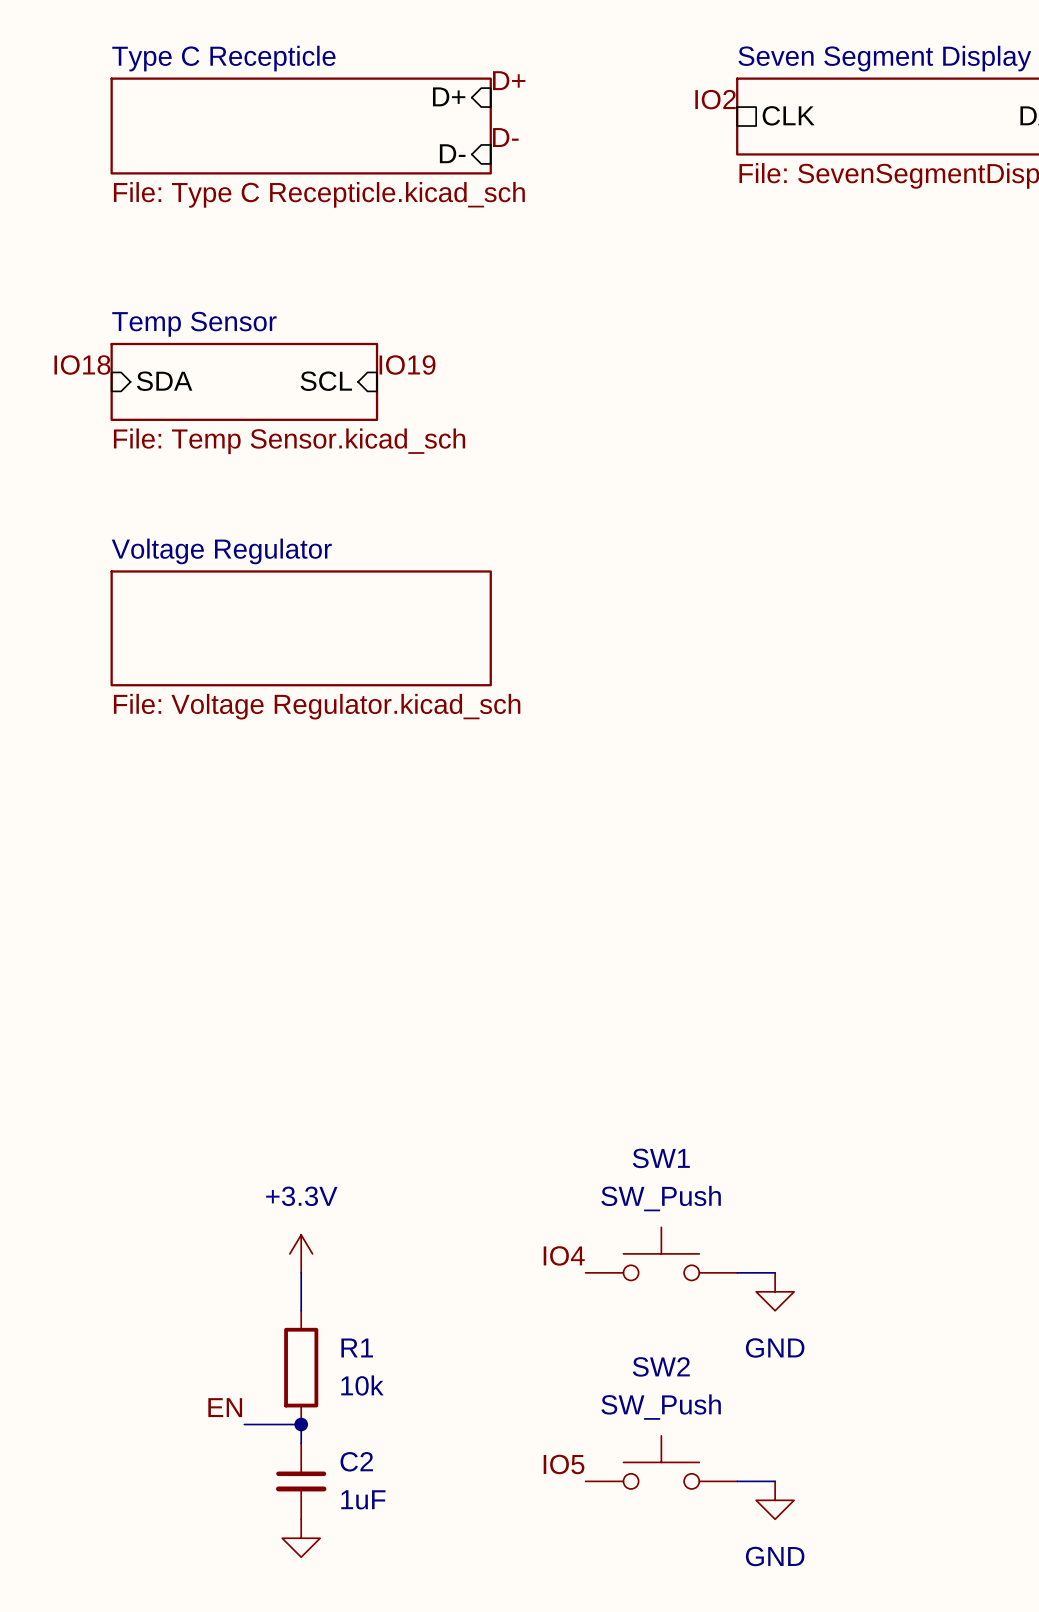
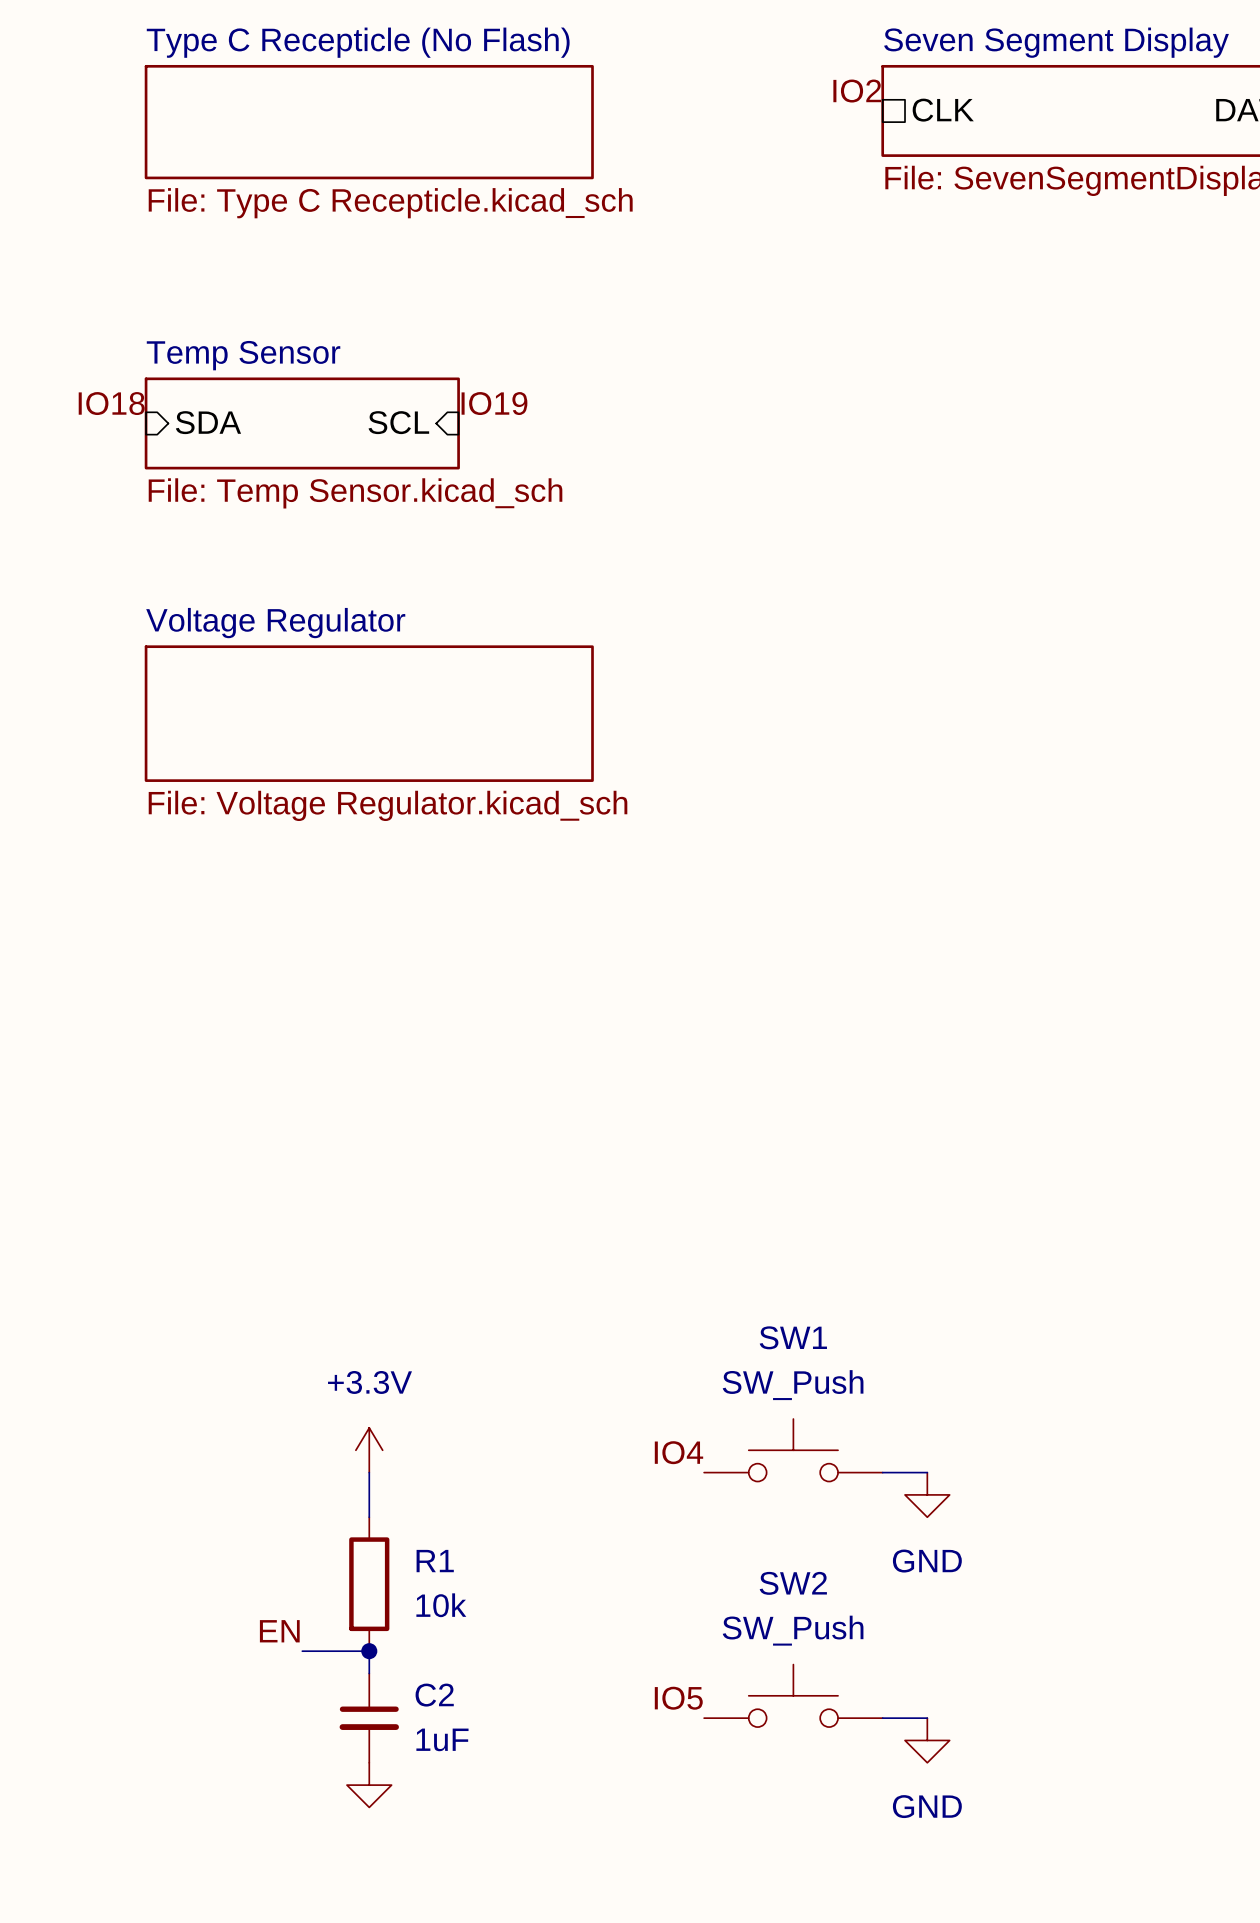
sheet Type C Recepticle name: Type C Recepticle (223, 58) -> Type C Recepticle (No Flash) (358, 42)
label: D+ (509, 80) -> none
sheet pin: D+ (449, 96) -> none
label: D- (505, 137) -> none
sheet pin: D- (452, 153) -> none

